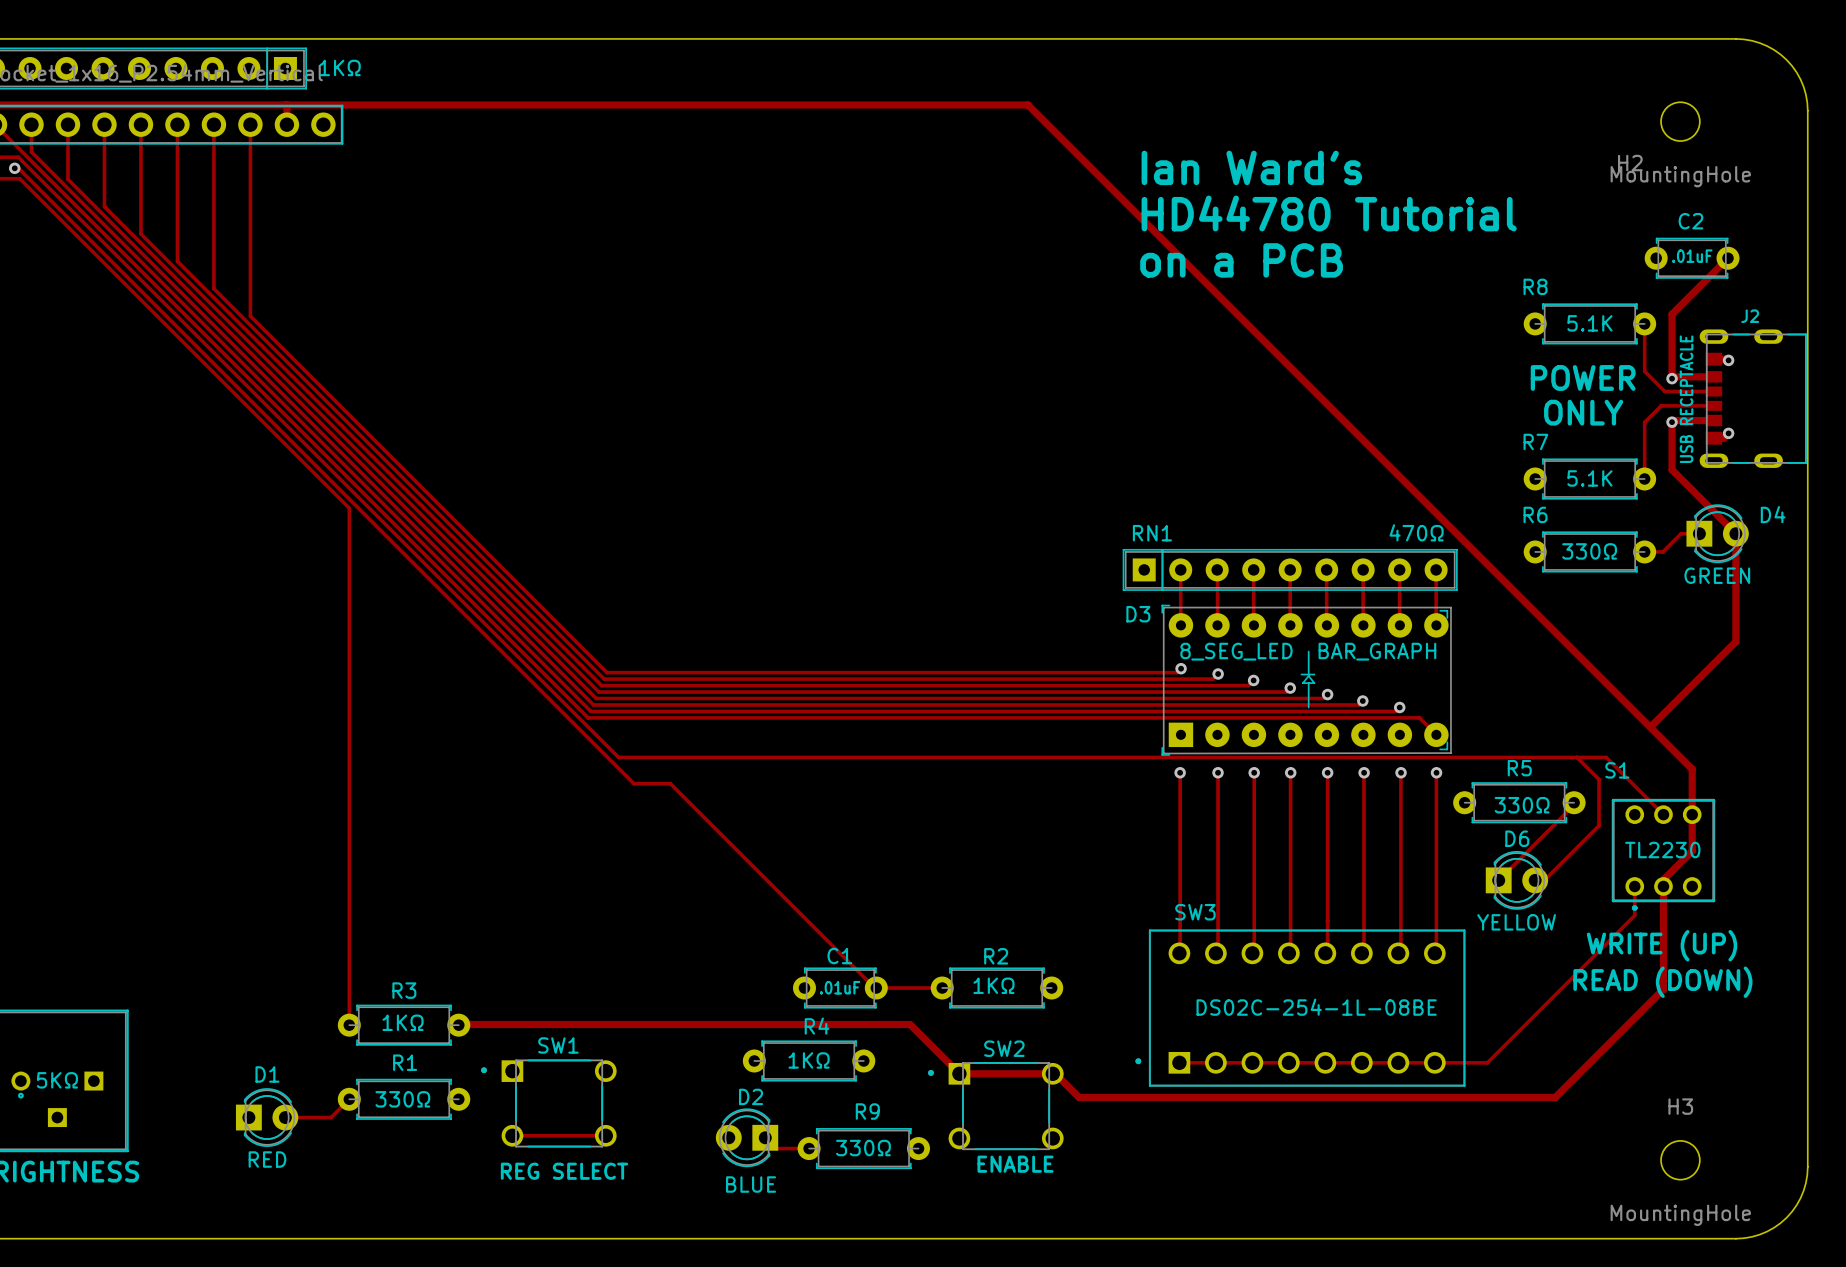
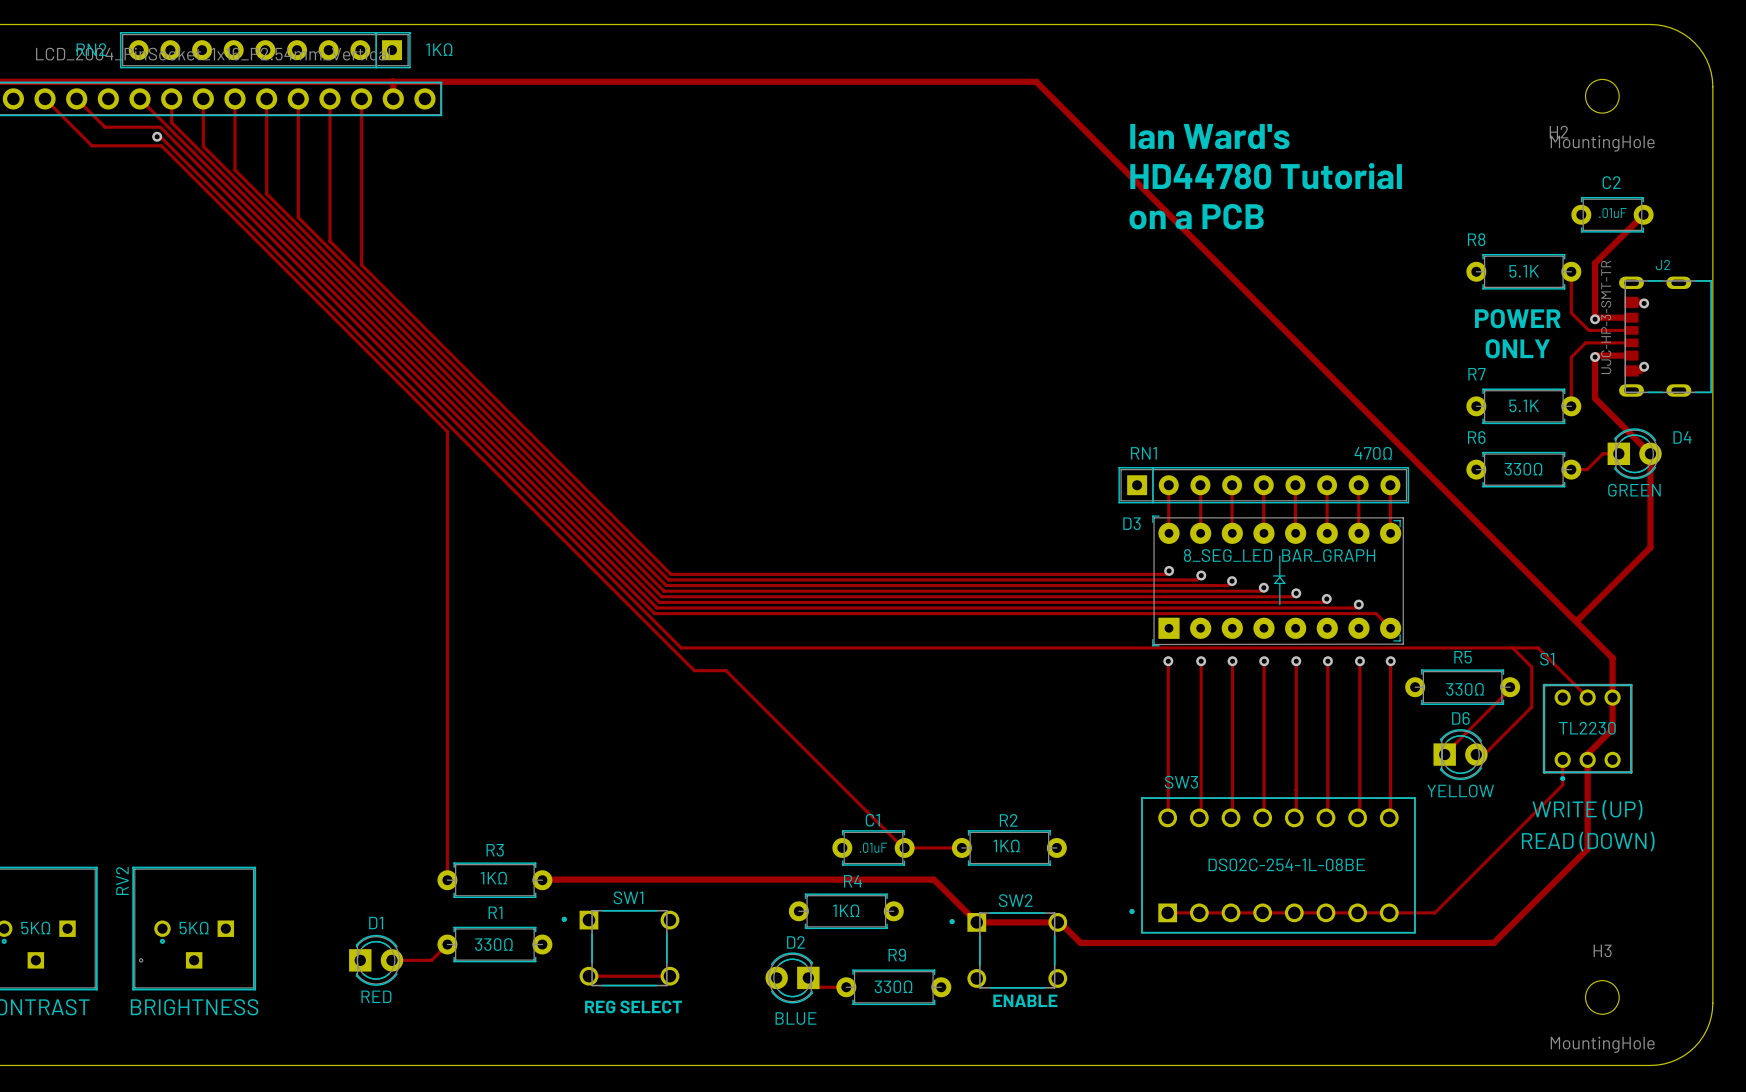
J2 value: USB RECEPTACLE (1686, 399) -> UJC-HP-3-SMT-TR (1606, 317)

